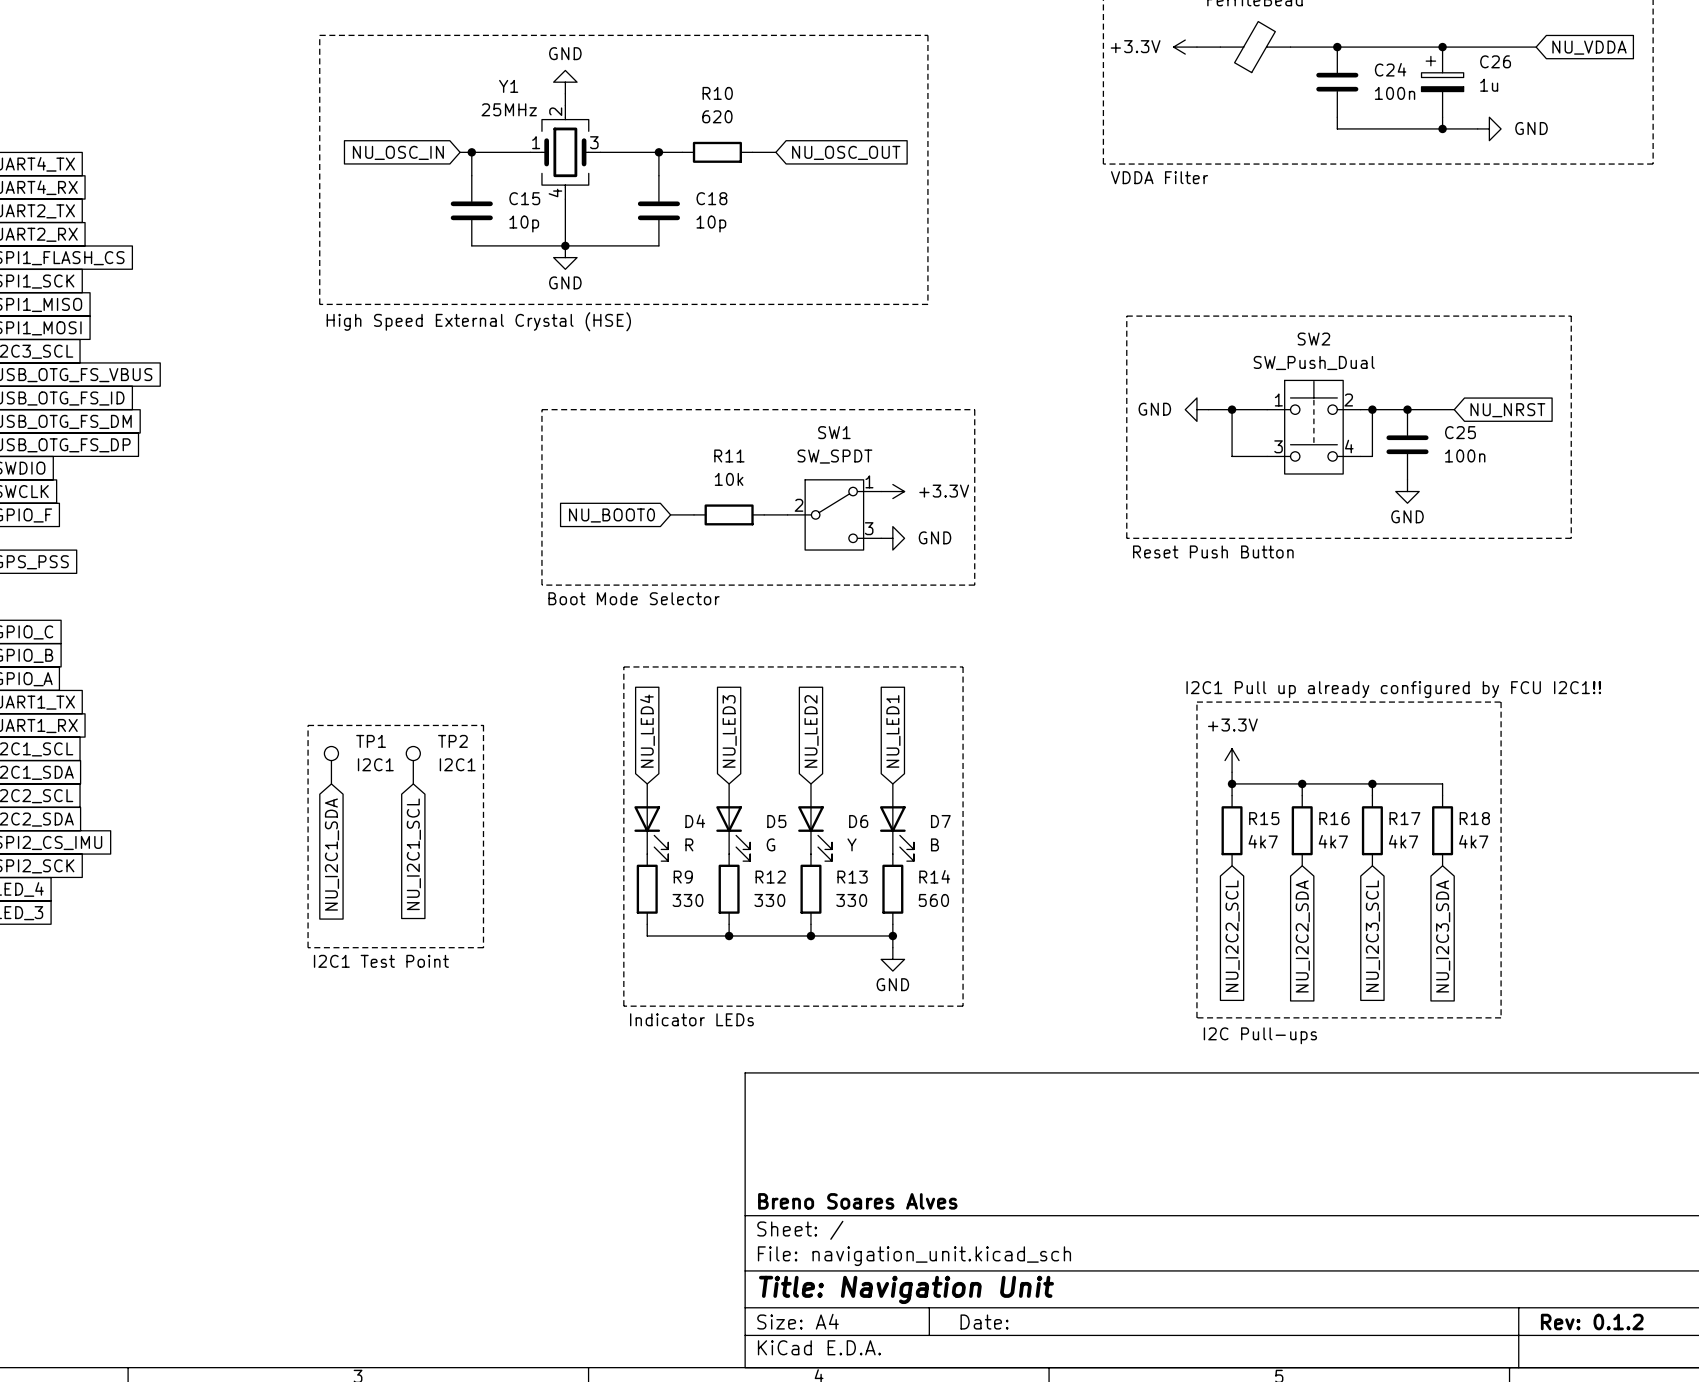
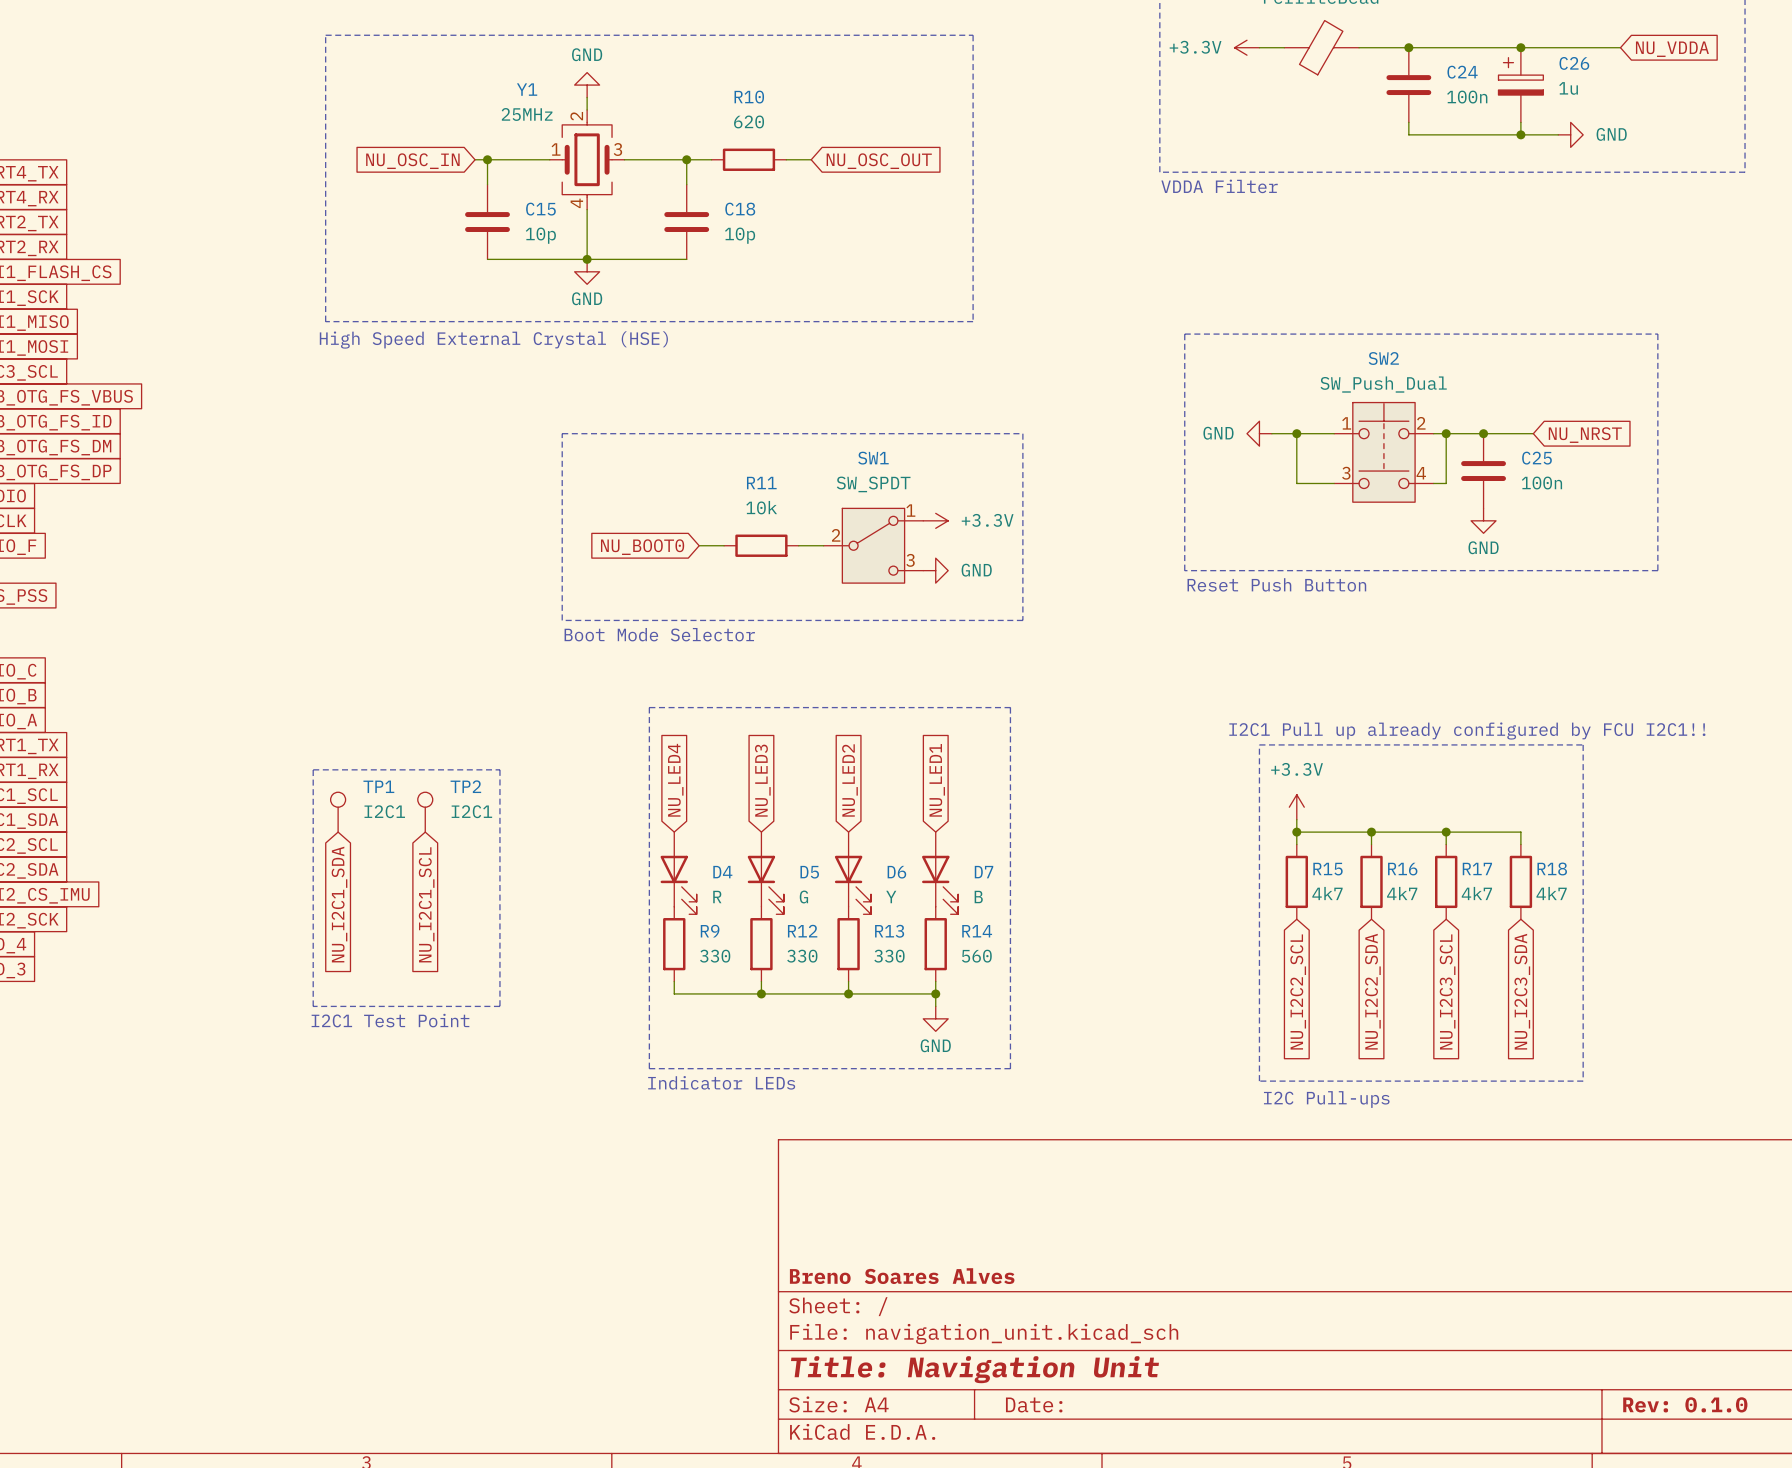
title block: Rev: 0.1.2 (1592, 1322) -> Rev: 0.1.0 (1685, 1404)

